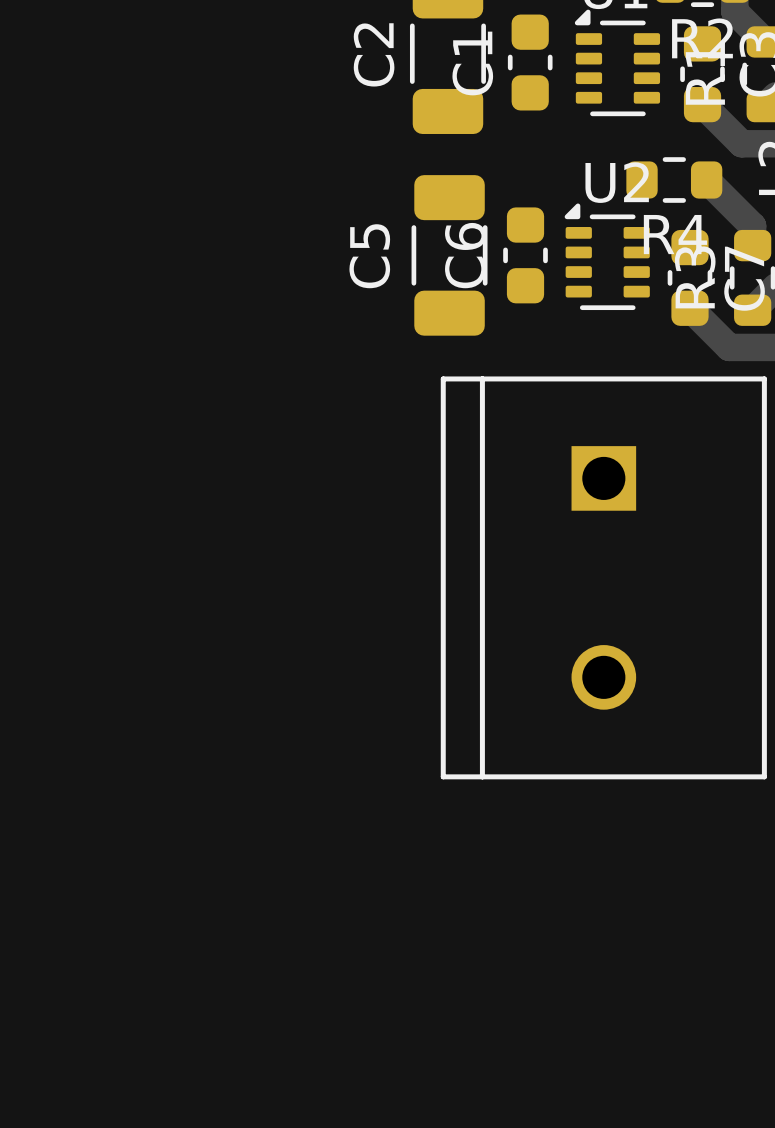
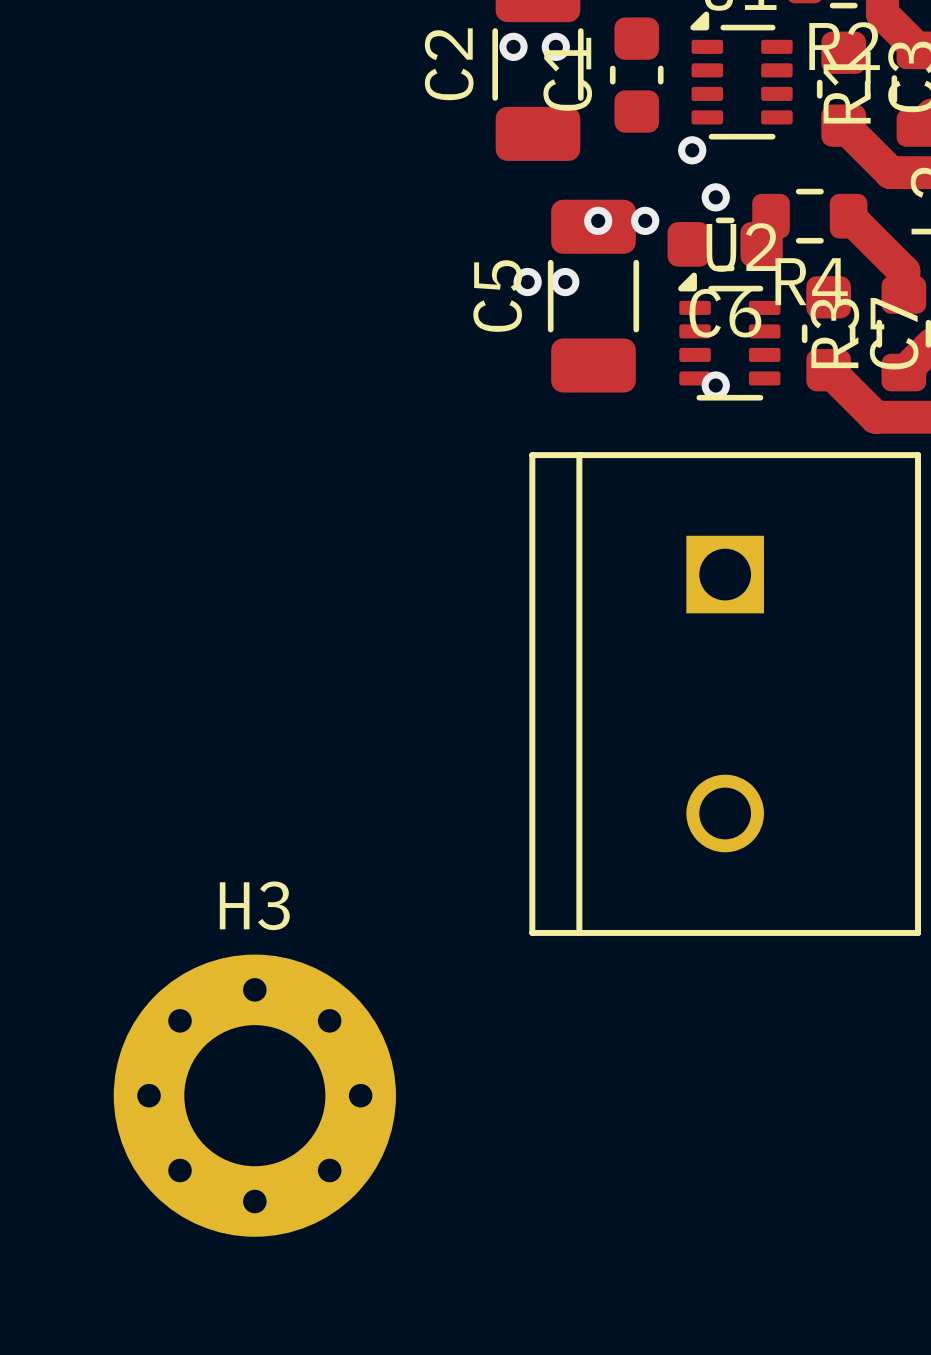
via: none -> (513, 46)
via: none -> (555, 46)
via: none -> (692, 150)
via: none -> (715, 197)
via: none -> (598, 220)
via: none -> (645, 220)
via: none -> (527, 282)
via: none -> (565, 282)
C5 position: (449, 255) -> (593, 296)
C6 name position: C6 (465, 255) -> C6 (725, 313)
C6 rotation: 0° (525, 255) -> 90° clockwise (725, 244)
C6 position: (525, 255) -> (725, 244)
U2 position: (607, 256) -> (729, 336)
via: none -> (715, 385)
H3: none -> (254, 1095)

